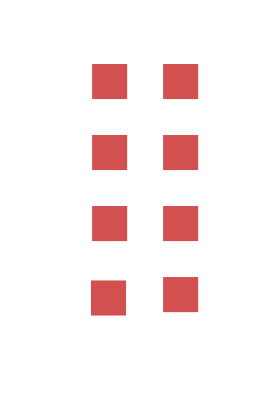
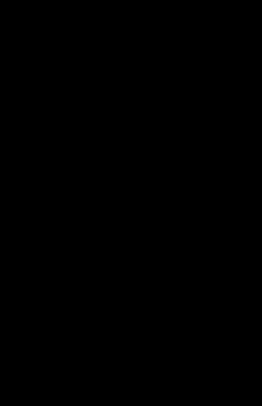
part: (109, 81) -> none
part: (180, 81) -> none
part: (109, 152) -> none
part: (180, 152) -> none
part: (109, 223) -> none
part: (180, 223) -> none
part: (180, 294) -> none
part: (108, 297) -> none

